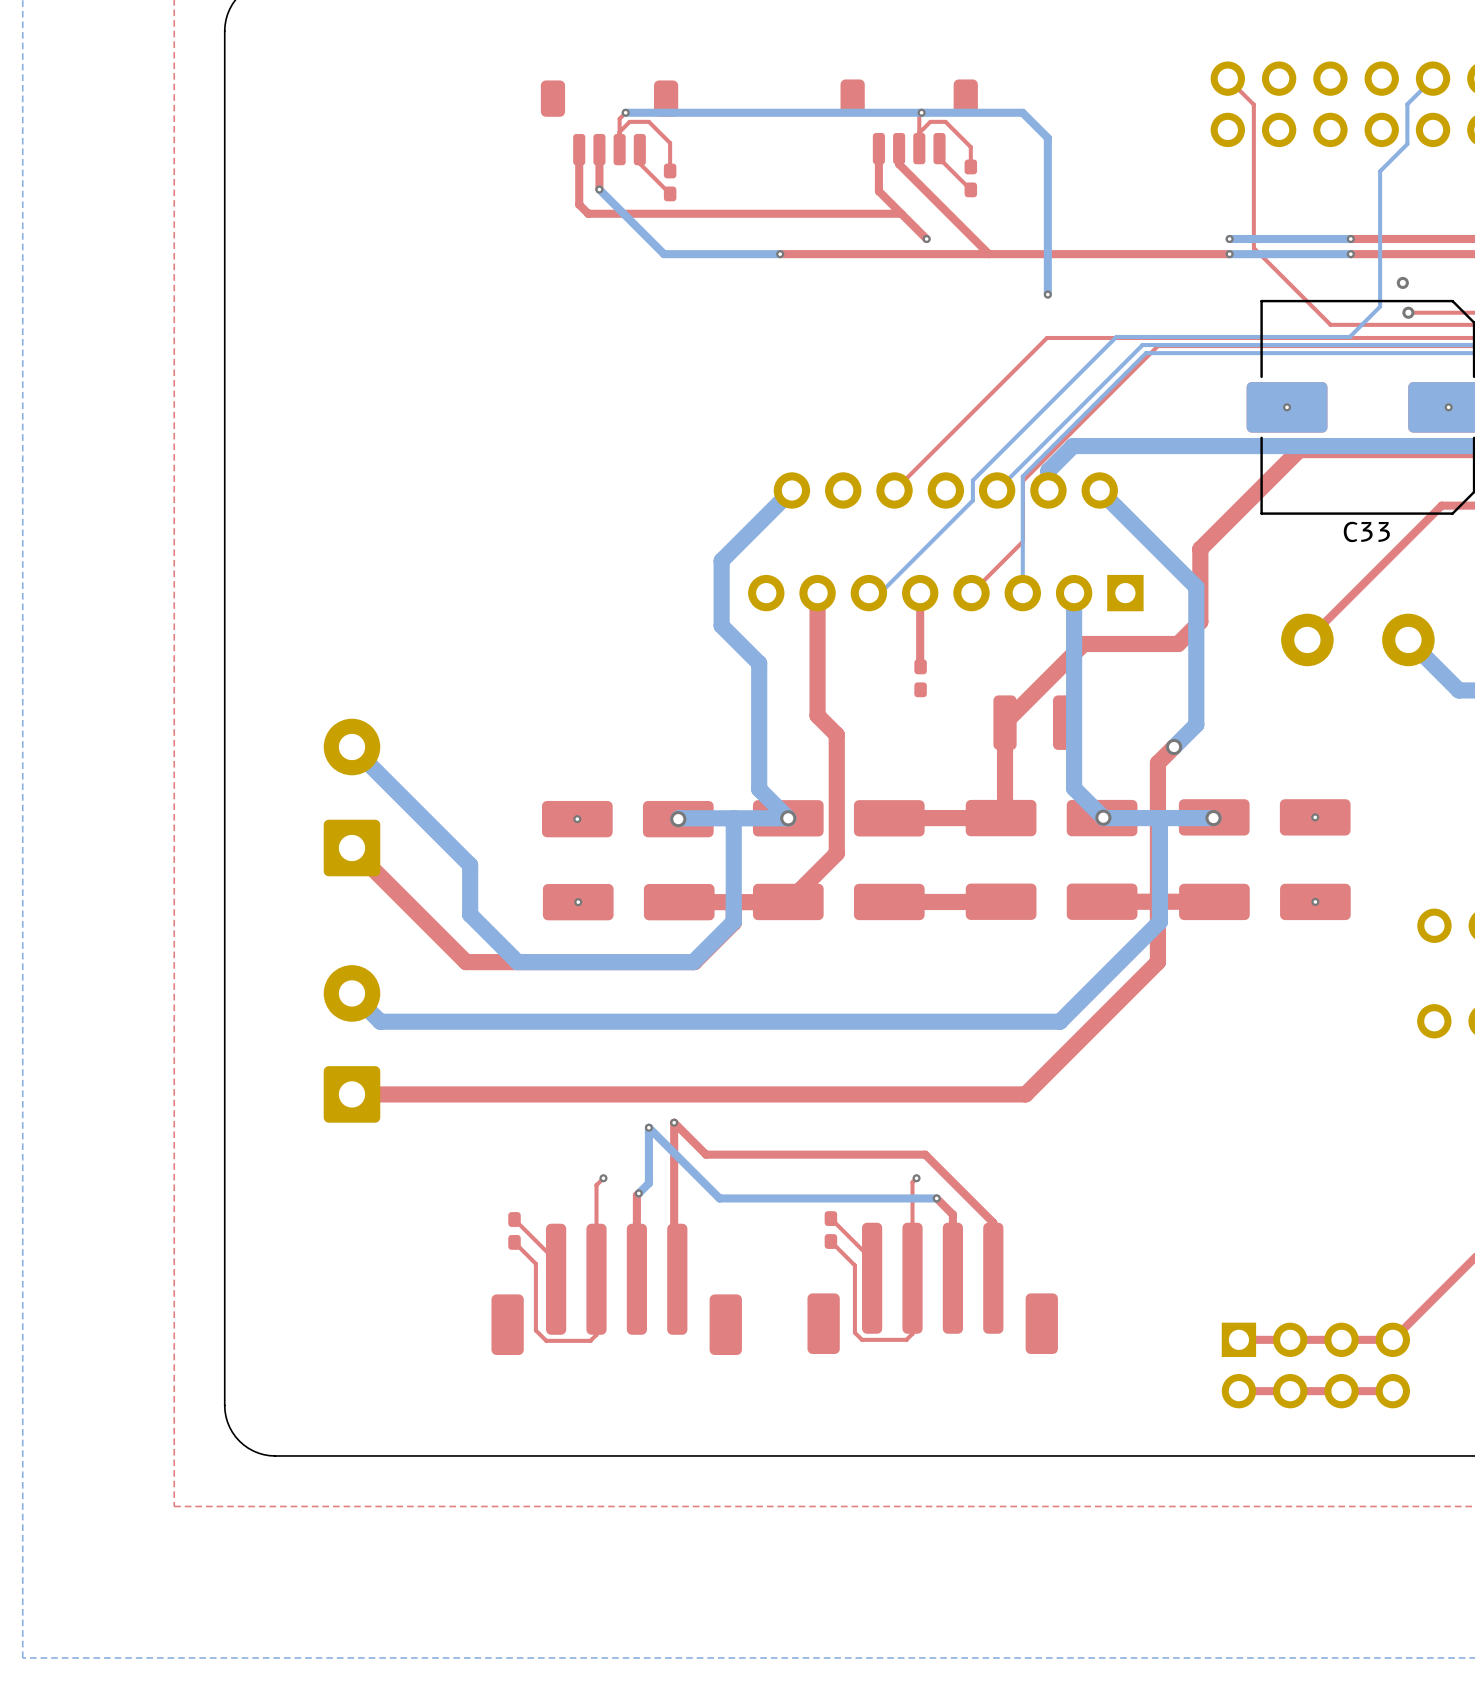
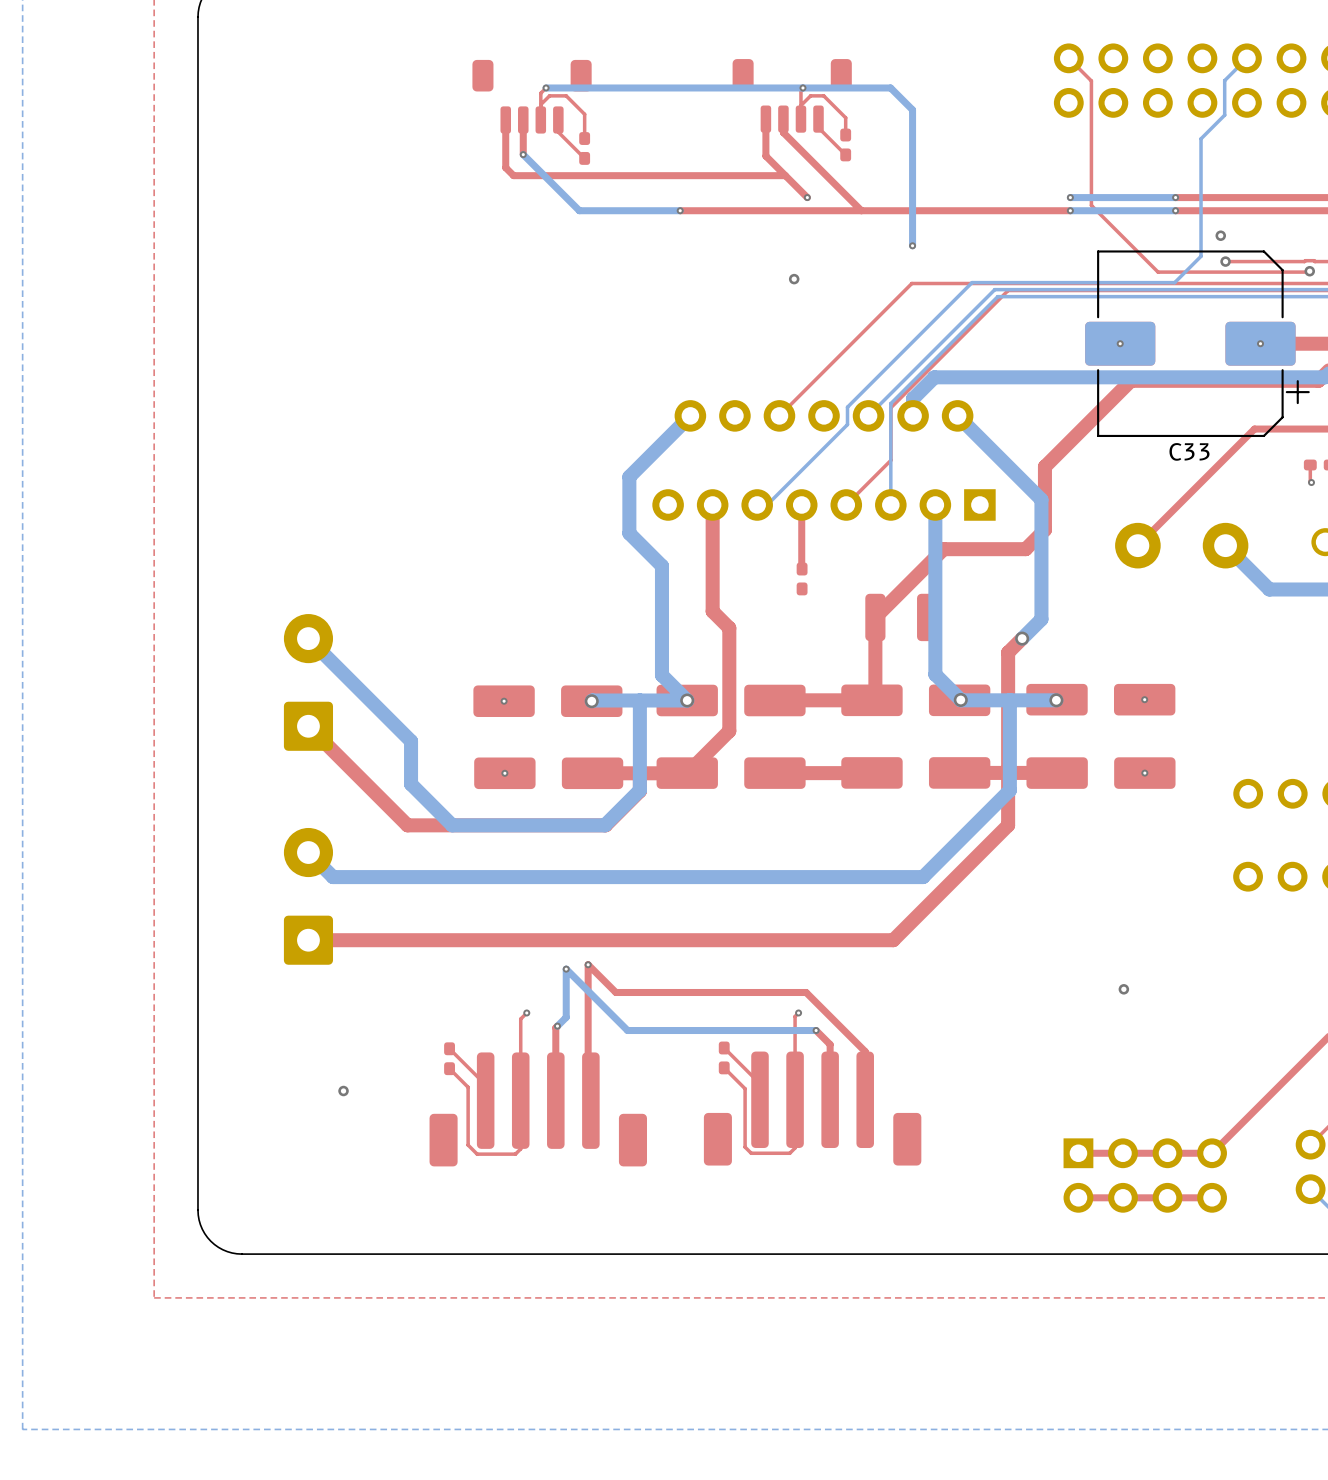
via: none -> (794, 279)
via: none -> (1123, 989)
via: none -> (343, 1091)

